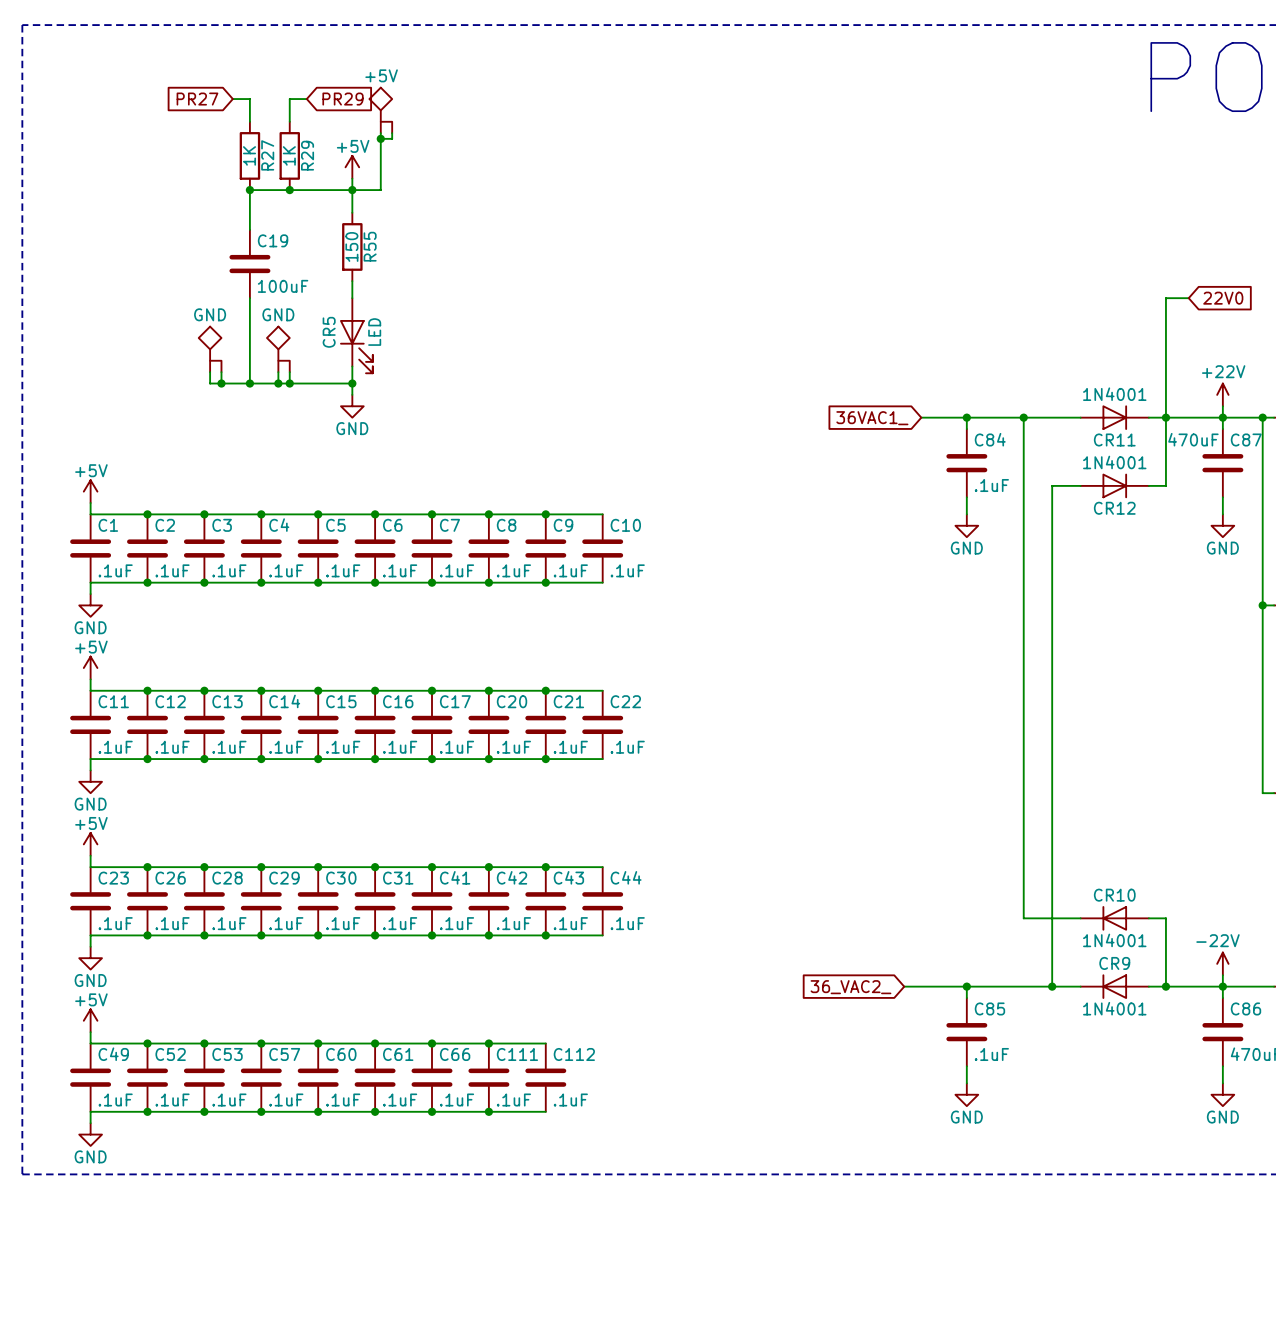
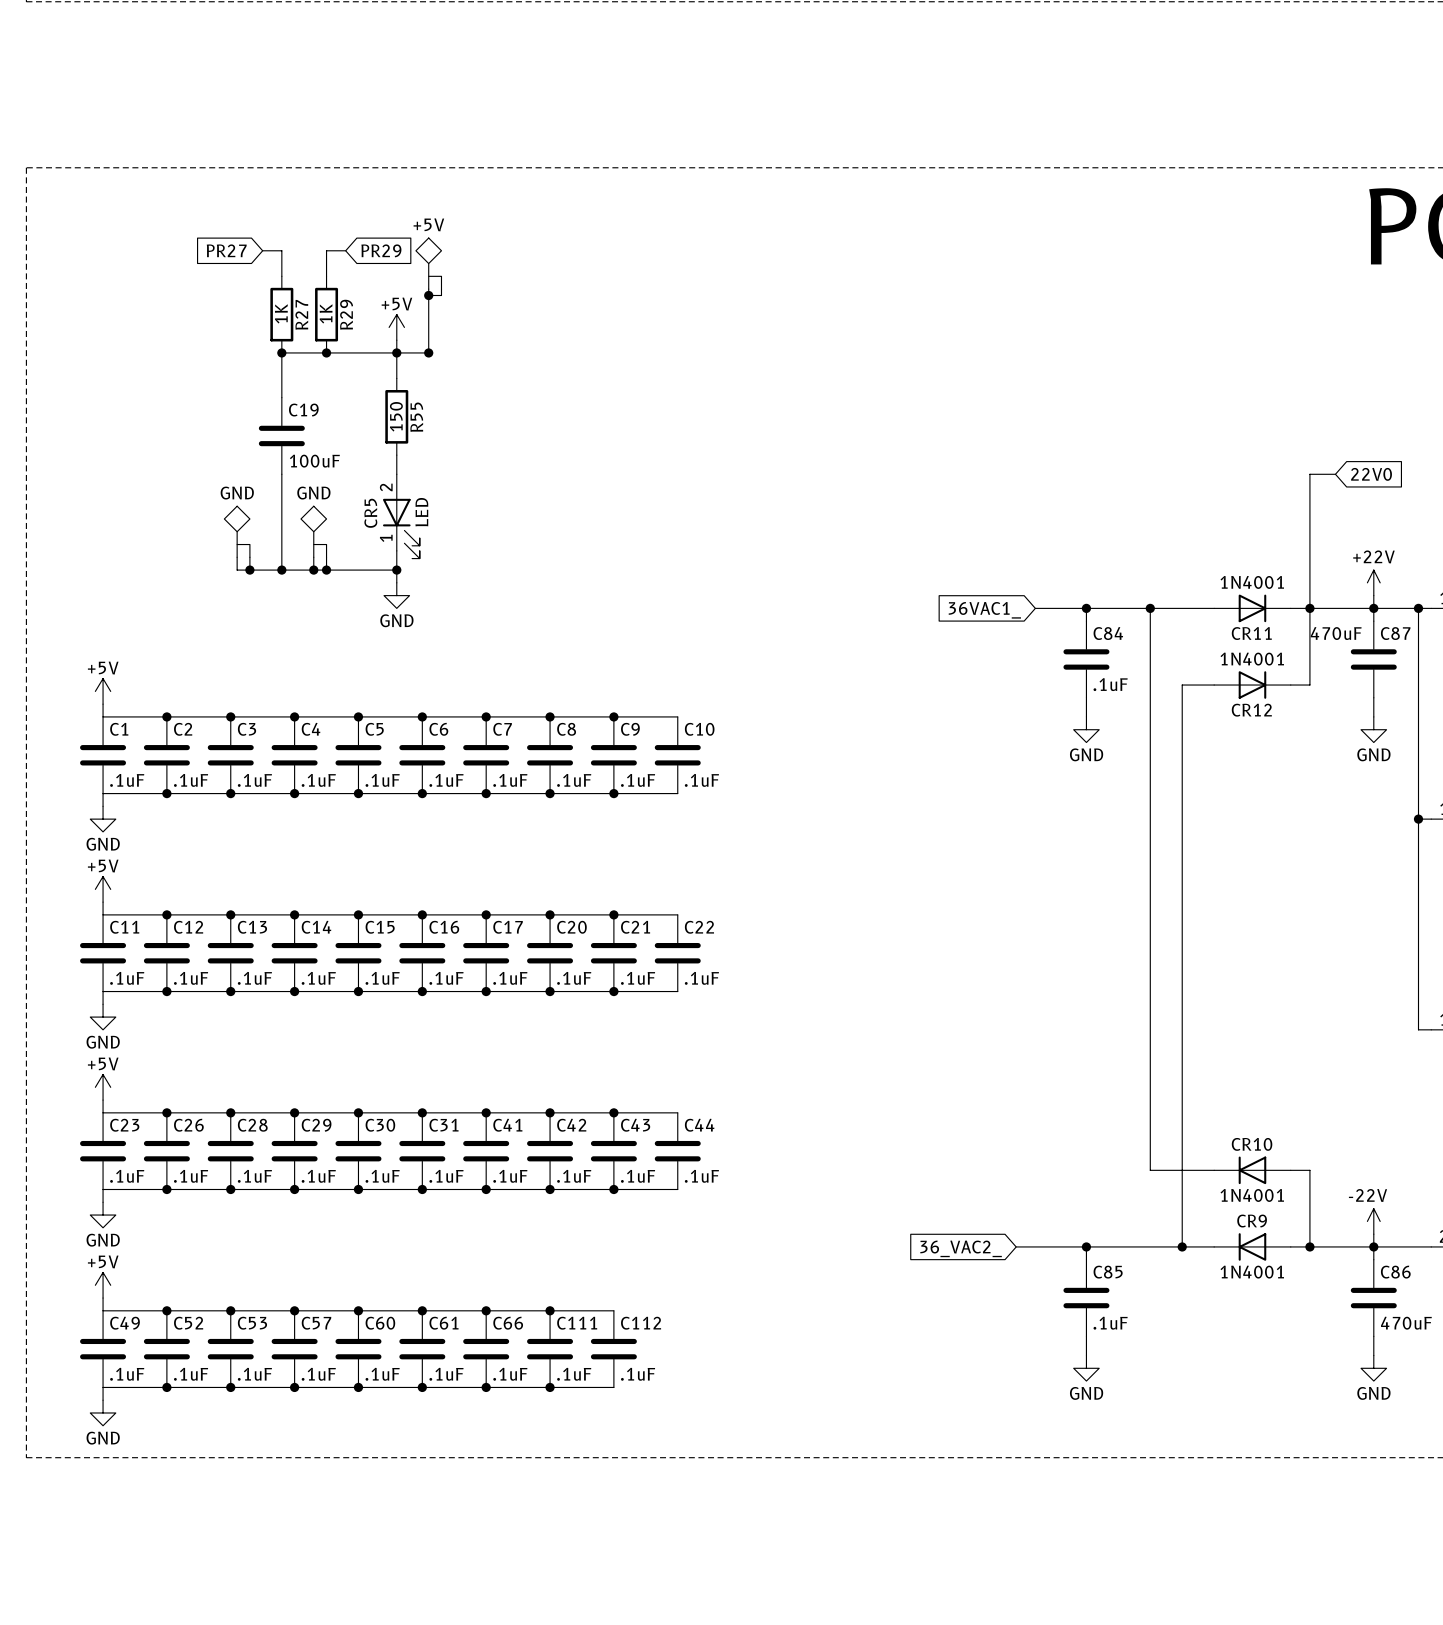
junction: none -> (428, 352)
CR5 pin number: none -> 2 (386, 487)
CR5 pin number: none -> 1 (386, 538)

